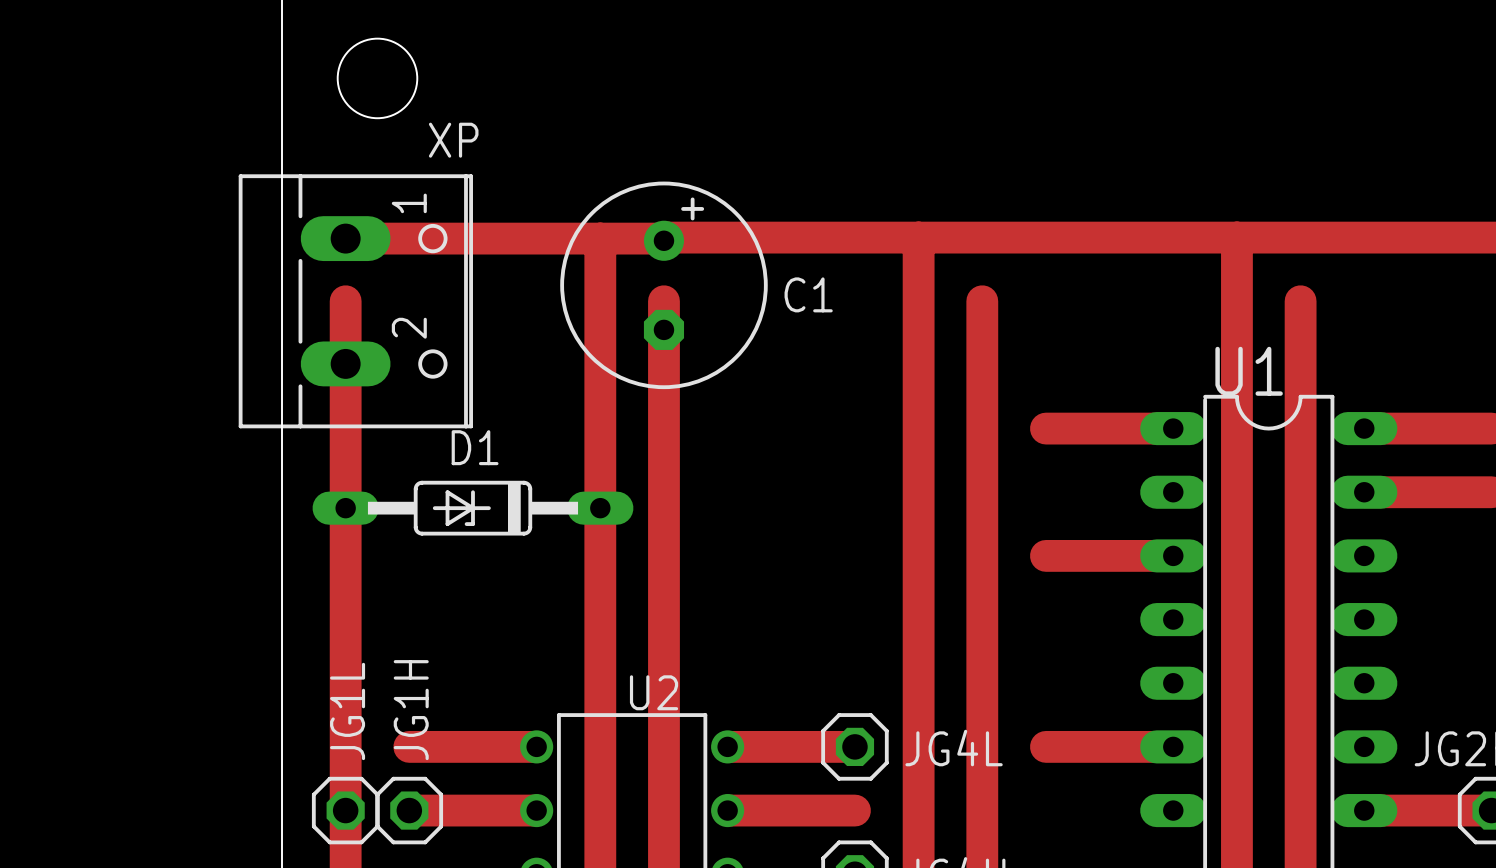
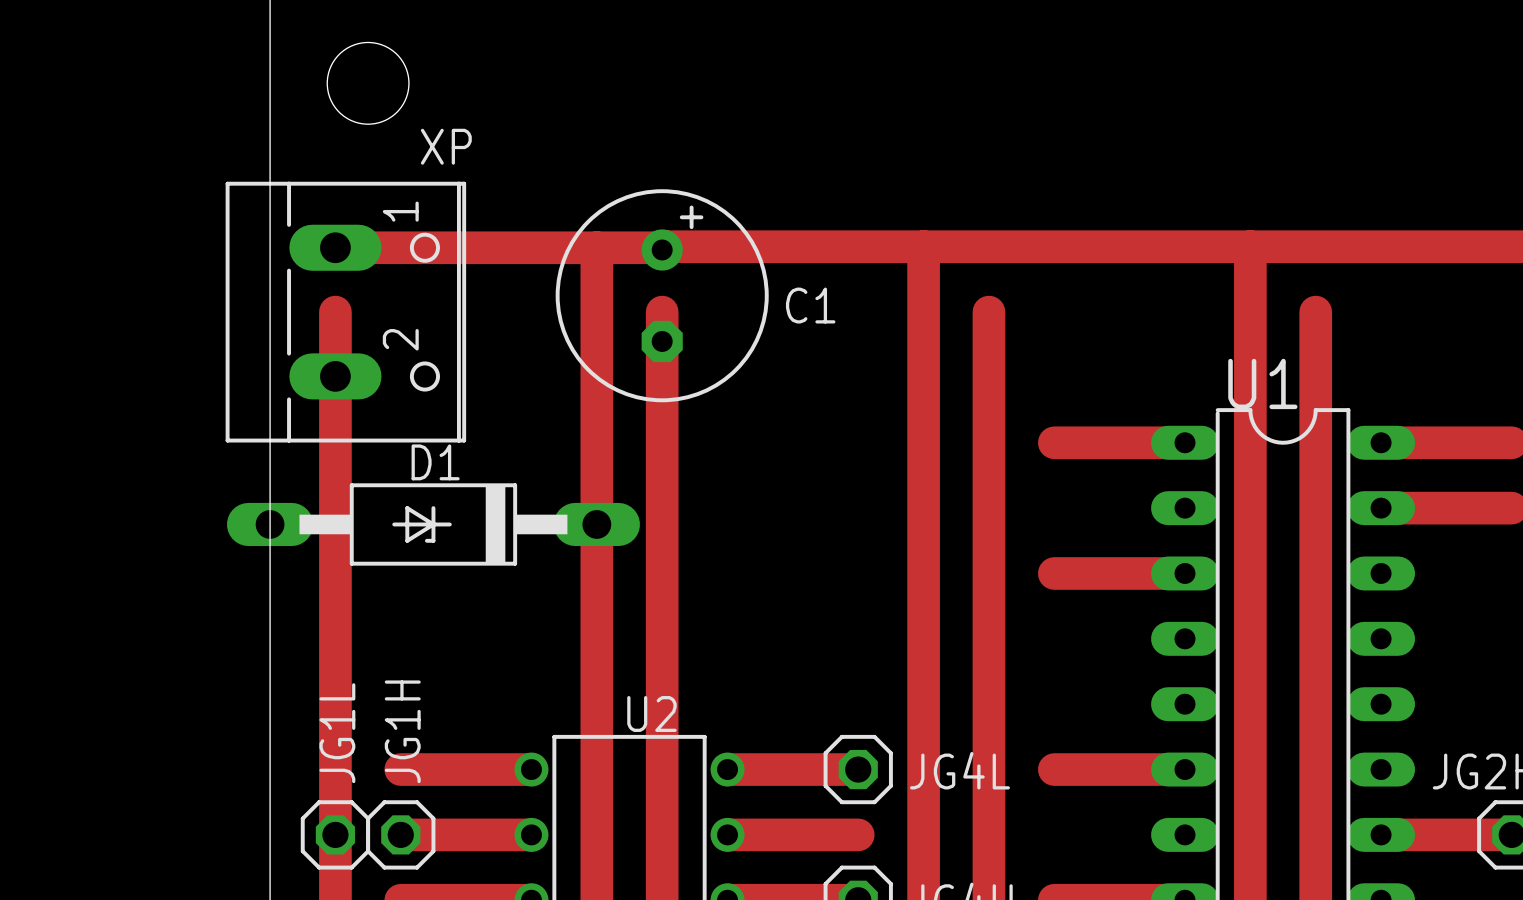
D1 footprint: [312, 480, 634, 536] -> [226, 483, 640, 566]

